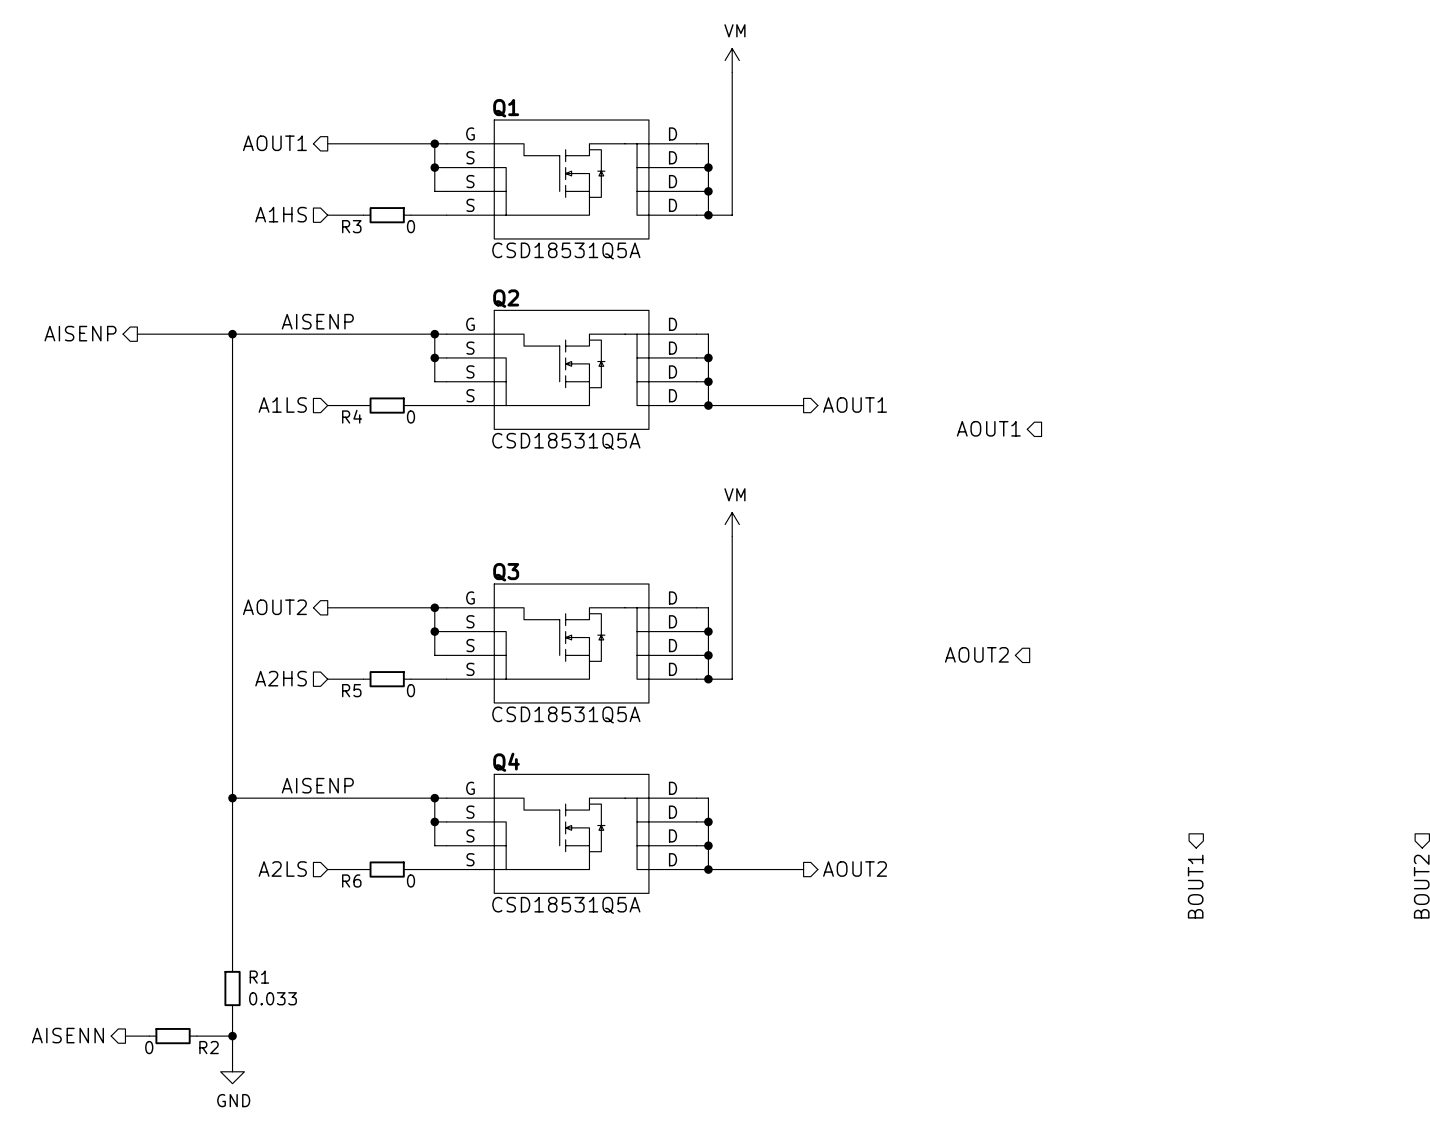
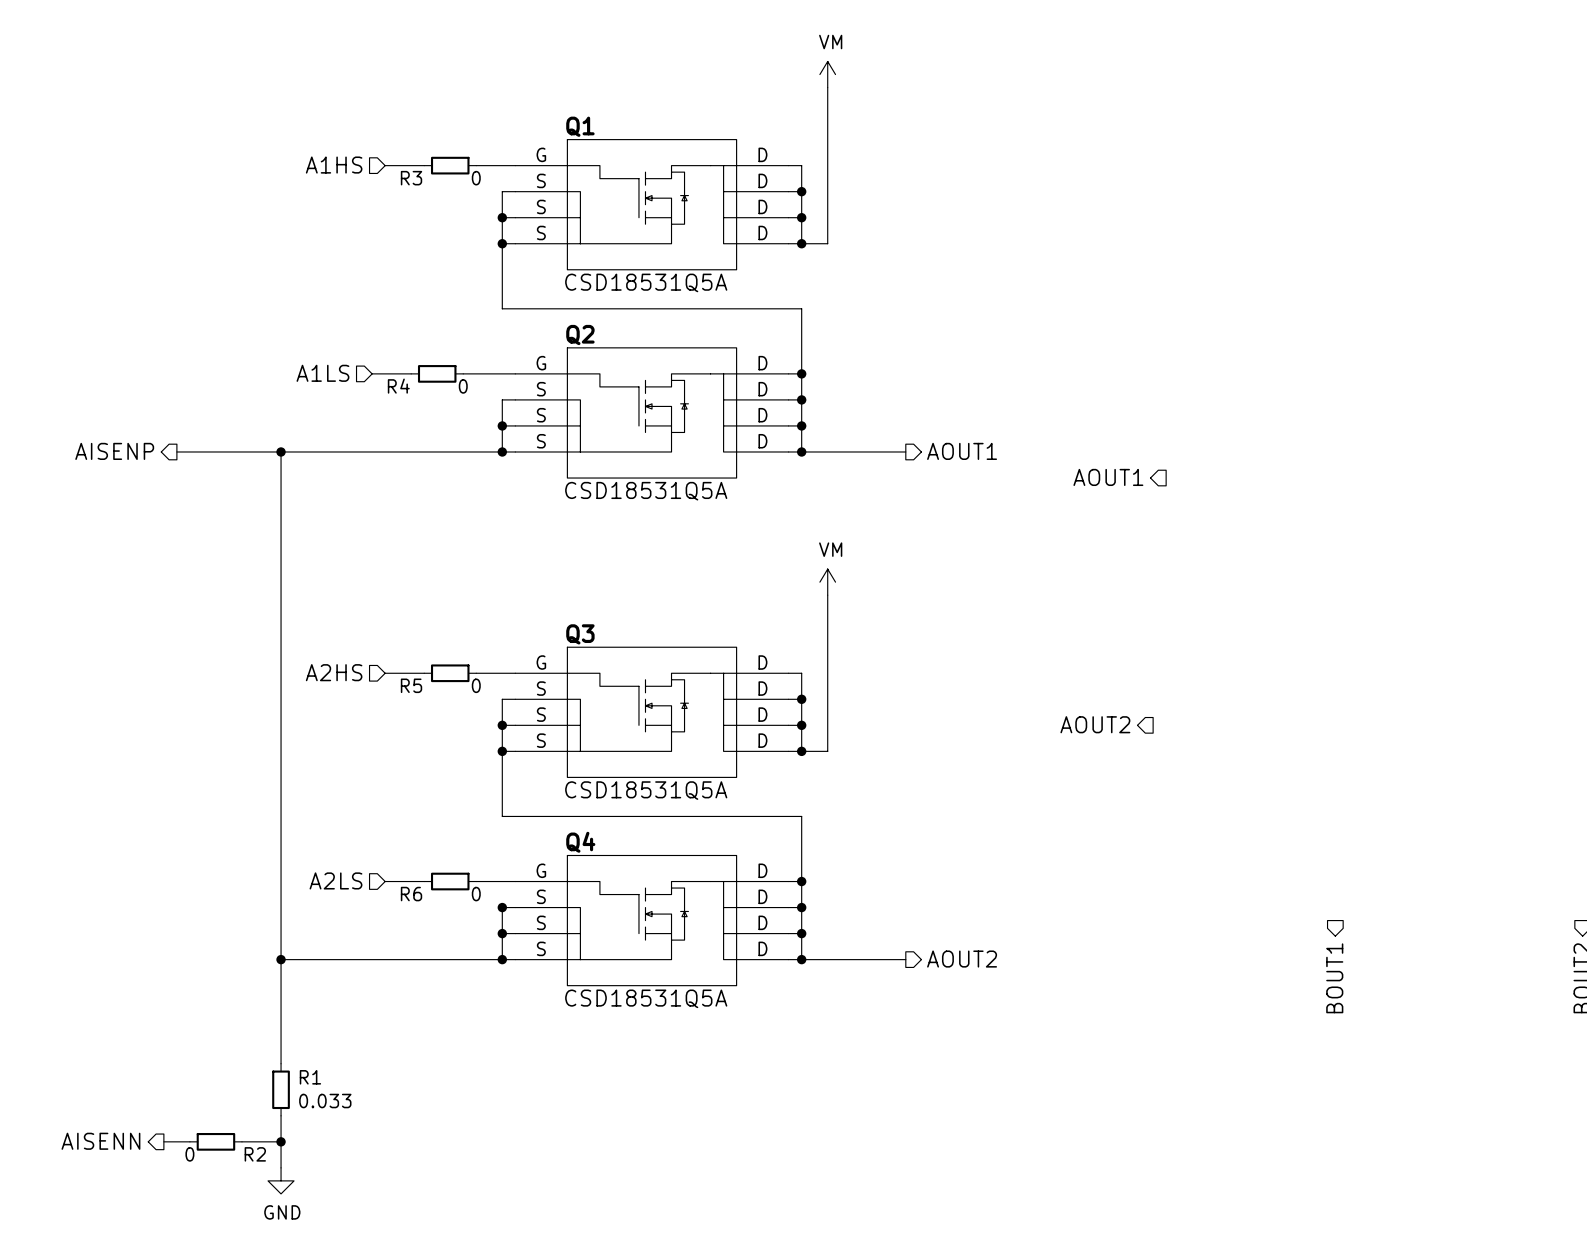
hierarchical label shape: output (274, 143) -> input (334, 165)
hierarchical label: AOUT1 (274, 143) -> A1HS (334, 165)
wire: (363, 143) (410, 143) -> none
wire: (434, 143) (434, 167) -> none
junction: (434, 143) -> none
junction: (434, 167) -> none
wire: none -> (502, 217) (502, 308) (801, 308) (801, 373)
junction: none -> (502, 217)
hierarchical label: A1HS (281, 214) -> none
wire: (327, 215) (363, 215) -> none
R3 position: (387, 215) -> (450, 165)
wire: (410, 215) (434, 215) -> none
junction: none -> (502, 243)
label: AISENP (317, 321) -> none
hierarchical label position: AISENP (80, 333) -> AISENP (114, 451)
wire: (137, 334) (315, 334) -> none
wire: (232, 334) (232, 405) -> none
junction: (232, 334) -> none
wire: (351, 334) (399, 334) -> (424, 451) (476, 451)
wire: (434, 334) (434, 357) -> (502, 425) (502, 451)
junction: (434, 334) -> none
junction: none -> (801, 373)
junction: (434, 357) -> none
junction: none -> (502, 425)
wire: none -> (176, 451) (385, 451)
junction: none -> (281, 451)
hierarchical label position: A1LS (282, 405) -> A1LS (322, 373)
R4 position: (387, 405) -> (437, 373)
junction: none -> (502, 451)
hierarchical label shape: output (274, 607) -> input (334, 672)
hierarchical label: AOUT2 (274, 607) -> A2HS (334, 672)
wire: (363, 607) (410, 607) -> none
wire: (434, 607) (434, 631) -> none
junction: (434, 607) -> none
junction: (434, 631) -> none
wire: none -> (502, 725) (502, 816) (801, 816) (801, 881)
junction: none -> (502, 725)
hierarchical label: A2HS (281, 678) -> none
wire: (327, 679) (363, 679) -> none
R5 position: (387, 679) -> (450, 673)
wire: (410, 679) (434, 679) -> none
junction: none -> (502, 751)
label: AISENP (317, 785) -> none
wire: (232, 798) (327, 798) -> (281, 959) (385, 959)
junction: (232, 798) -> none
wire: (363, 798) (410, 798) -> (424, 959) (476, 959)
wire: (434, 798) (434, 821) -> (502, 933) (502, 959)
junction: (434, 798) -> none
junction: none -> (801, 881)
junction: none -> (502, 933)
junction: none -> (281, 959)
hierarchical label position: A2LS (282, 869) -> A2LS (335, 880)
R6 position: (387, 869) -> (450, 881)
junction: none -> (502, 959)

